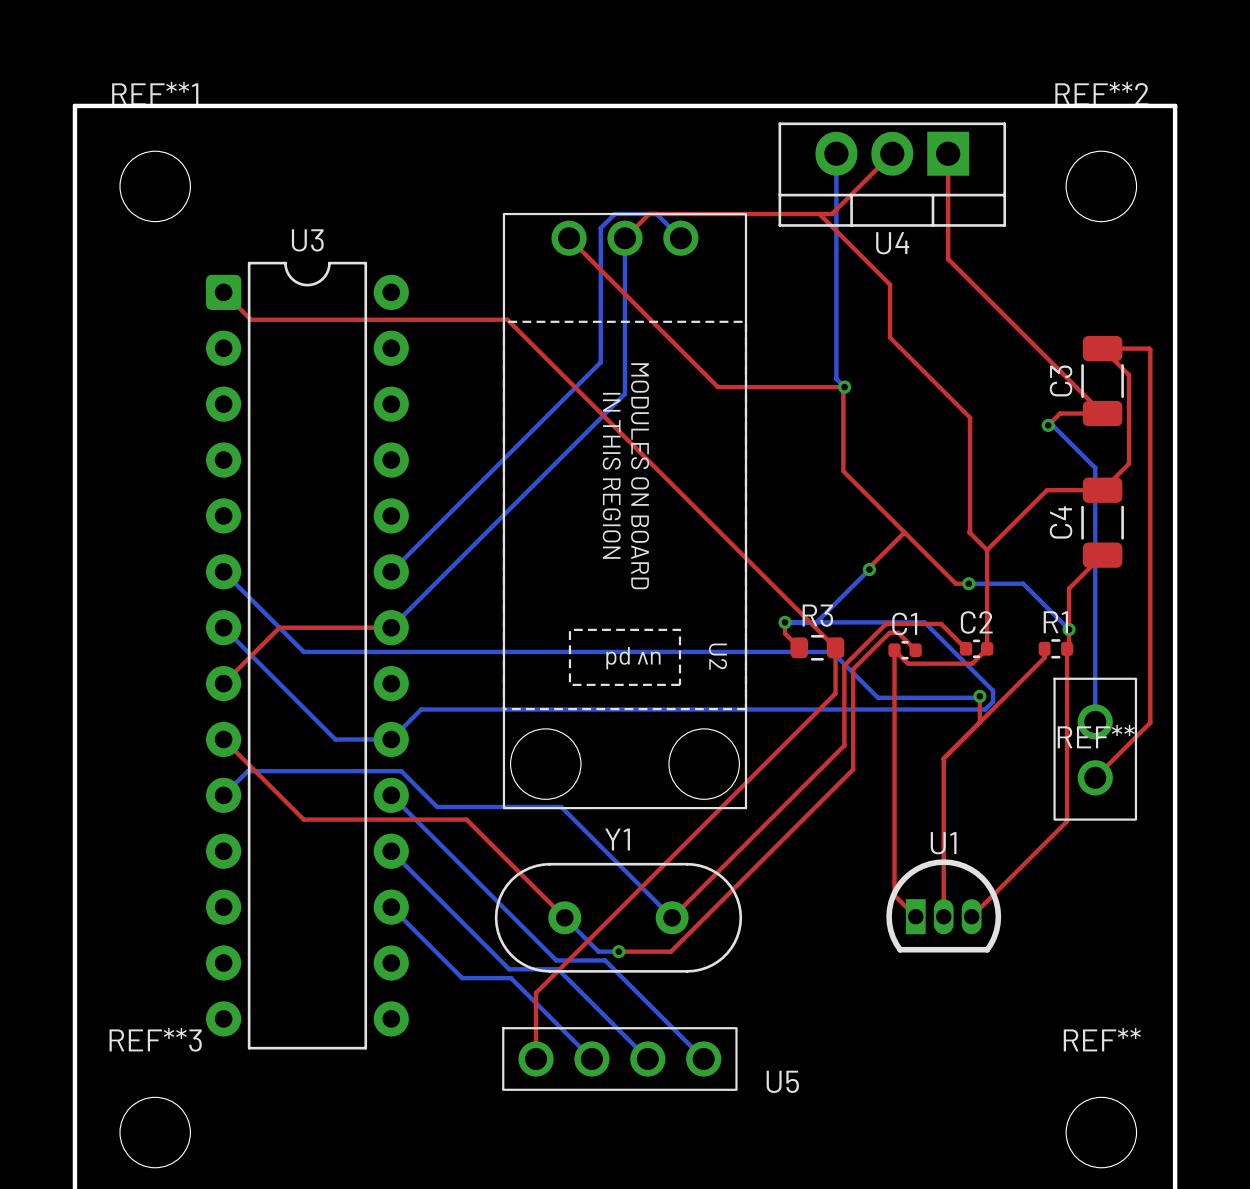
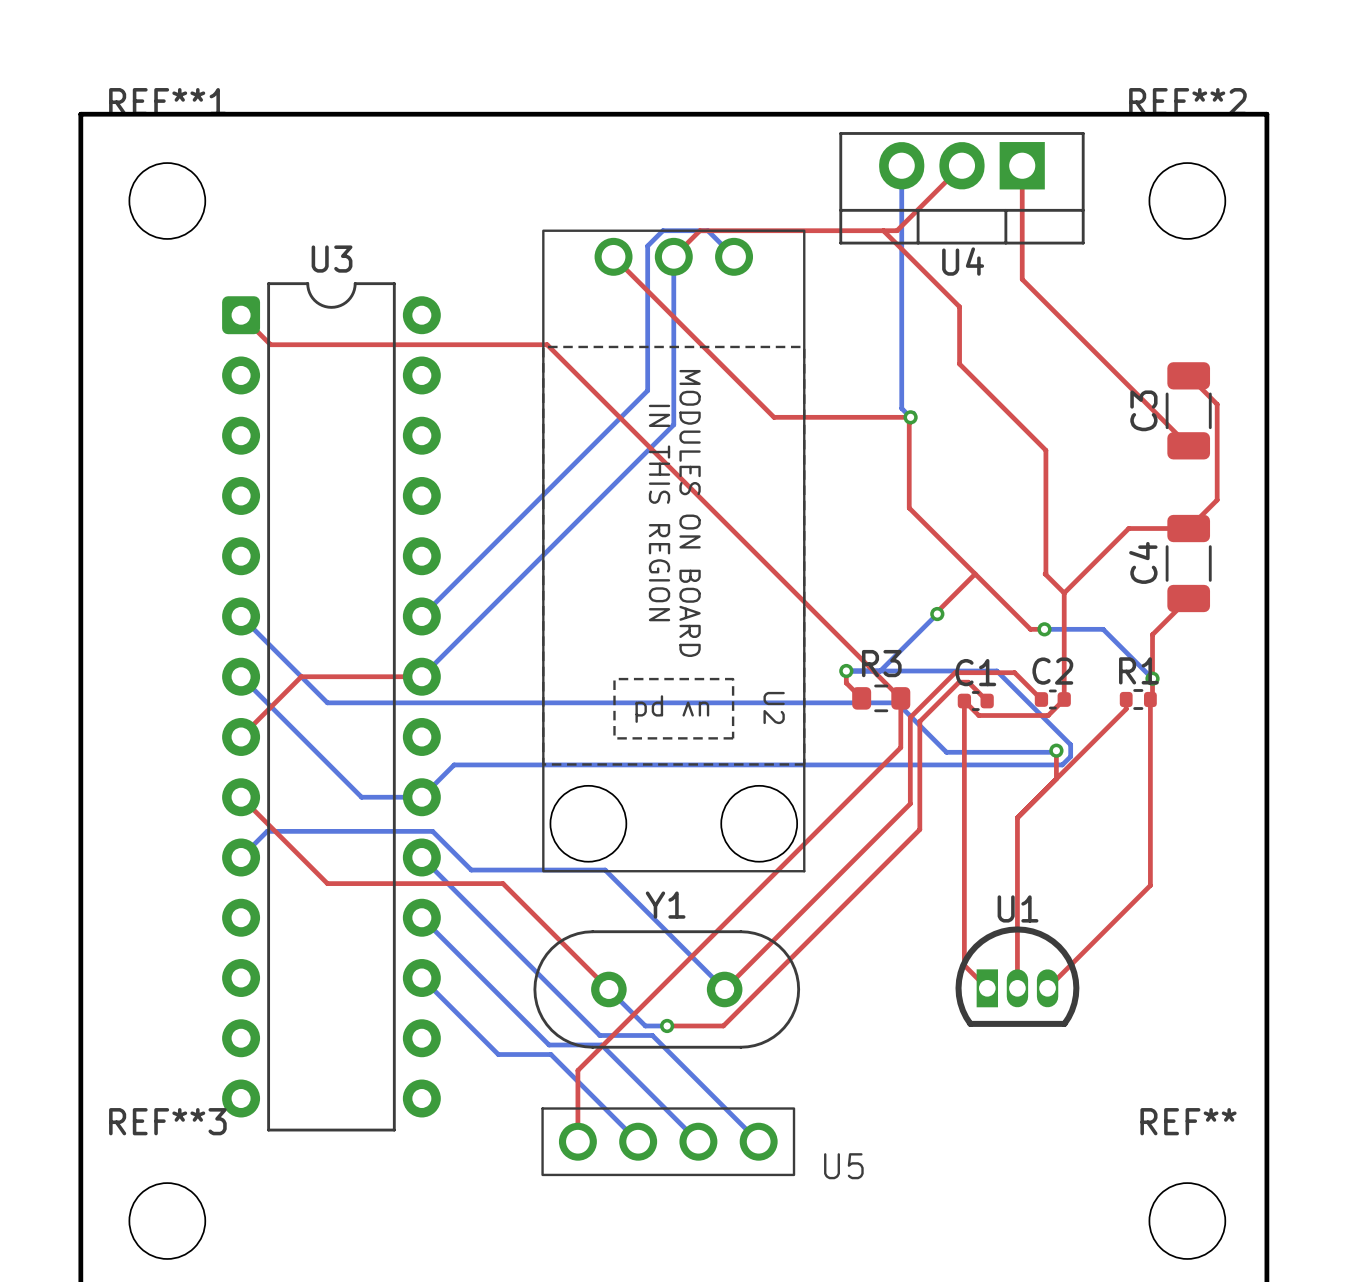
top track: (1102, 348) (1150, 349) (1150, 722) (1095, 777) -> none
top track: (1102, 413) (1060, 413) (1048, 425) -> none
bottom track: (1048, 425) (1052, 425) (1095, 467) (1095, 721) -> none
via: (1048, 425) -> none
REF**: (1095, 749) -> none

